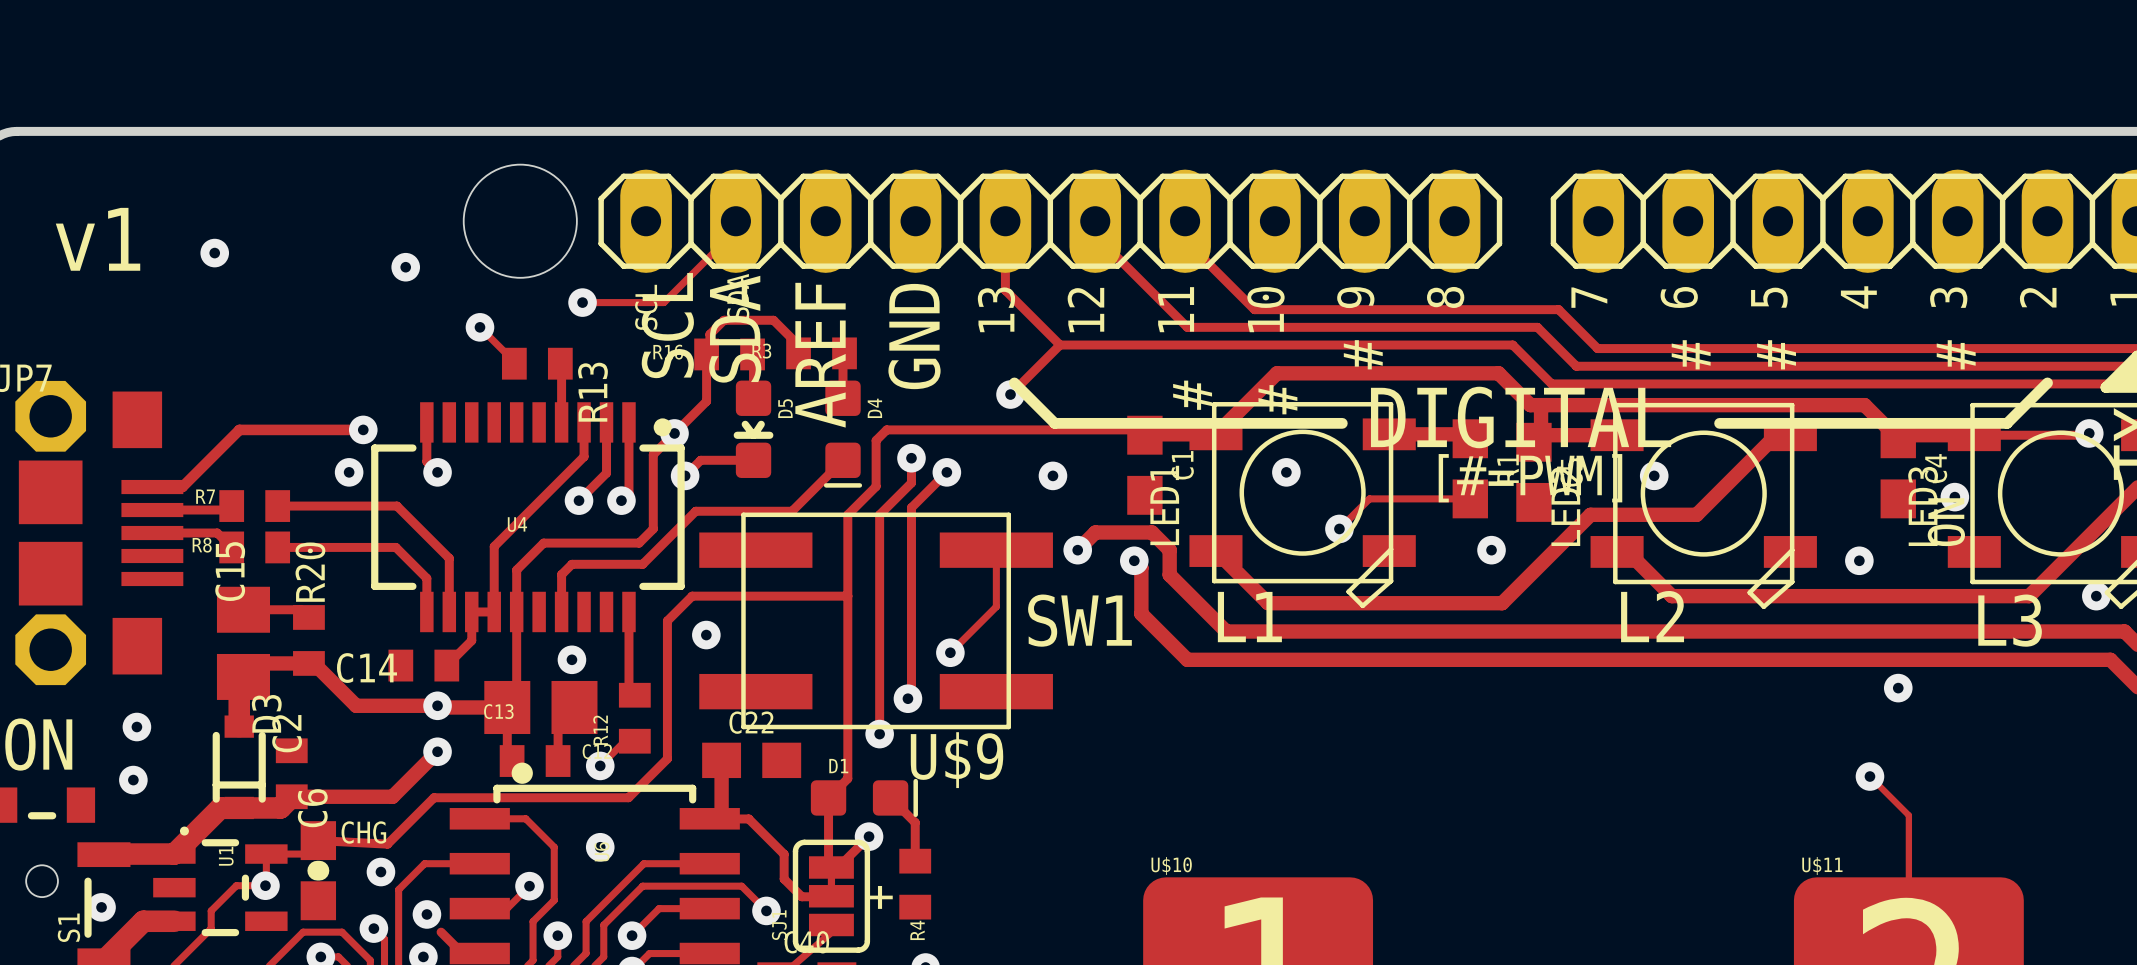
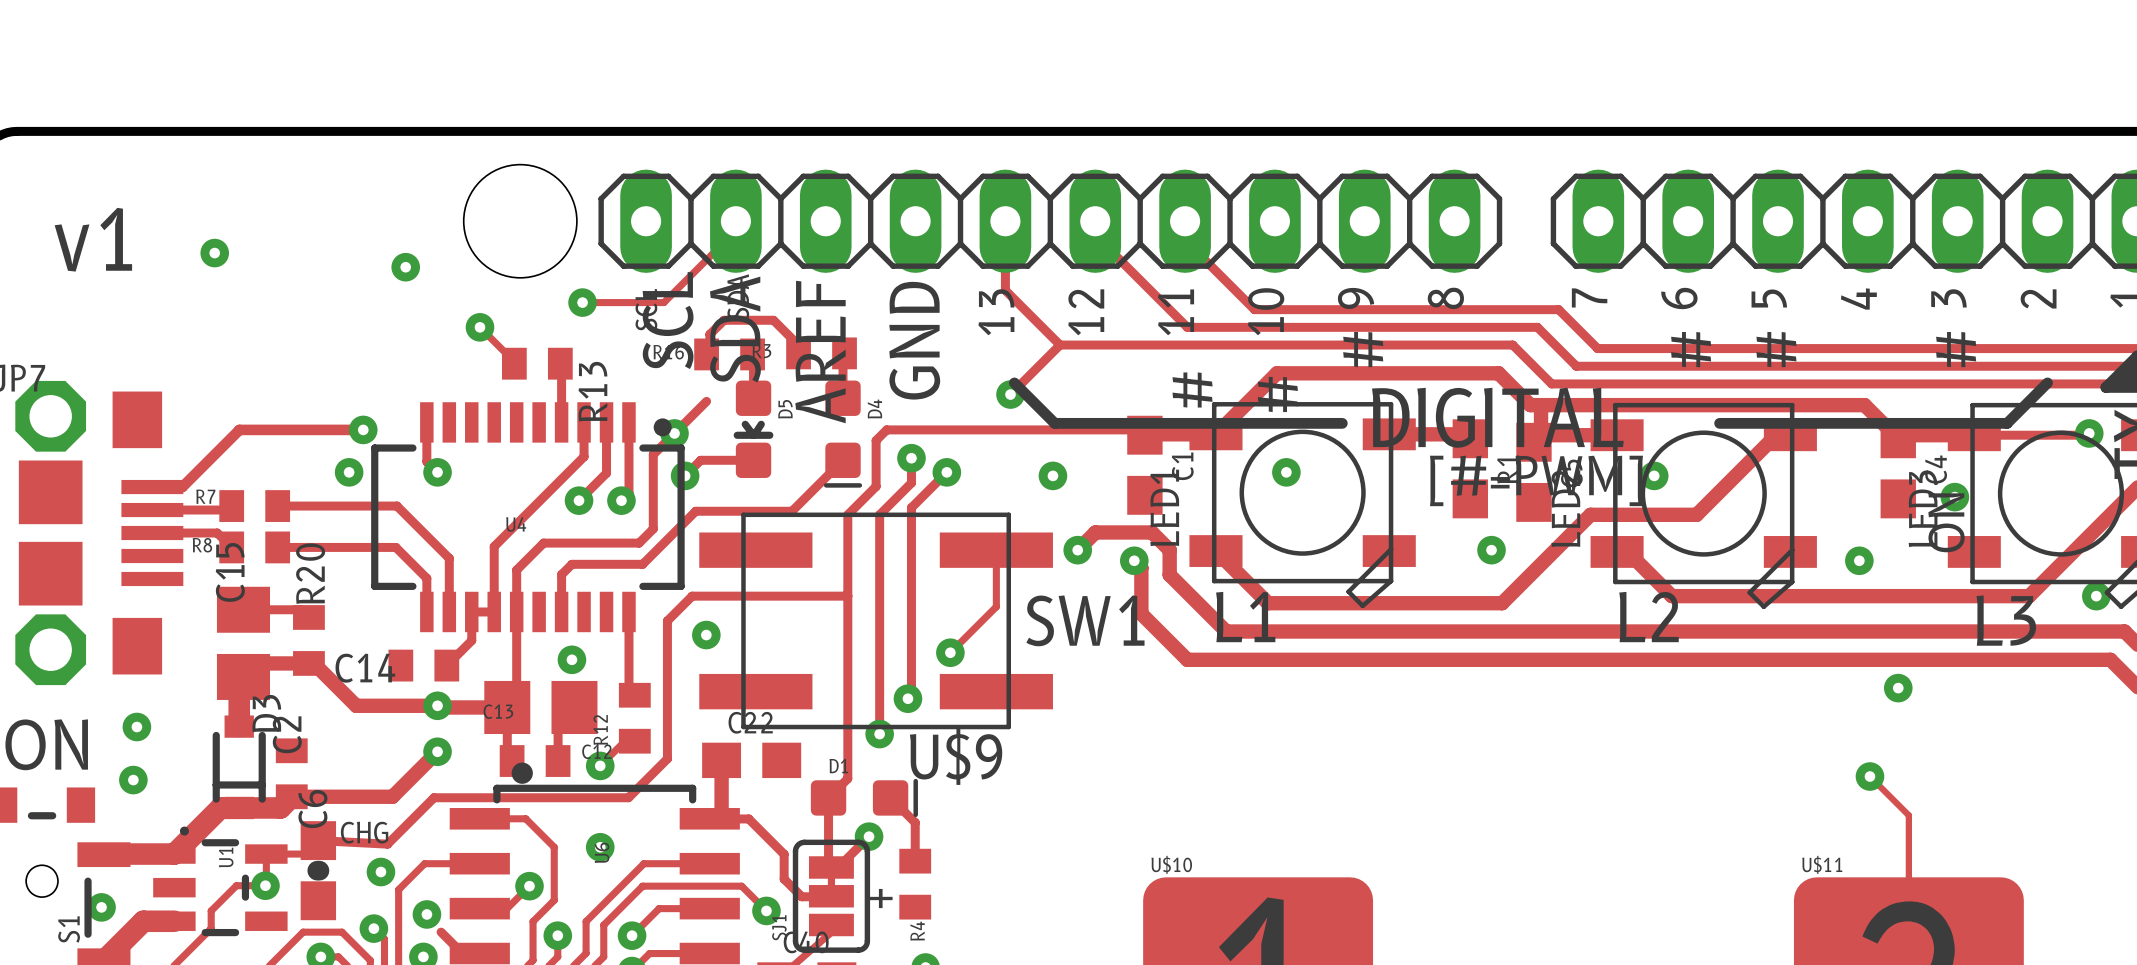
track: (706, 354) (706, 401) -> none
track: (1470, 498) (1369, 498) (1339, 528) -> none
via: (1339, 528) -> none

